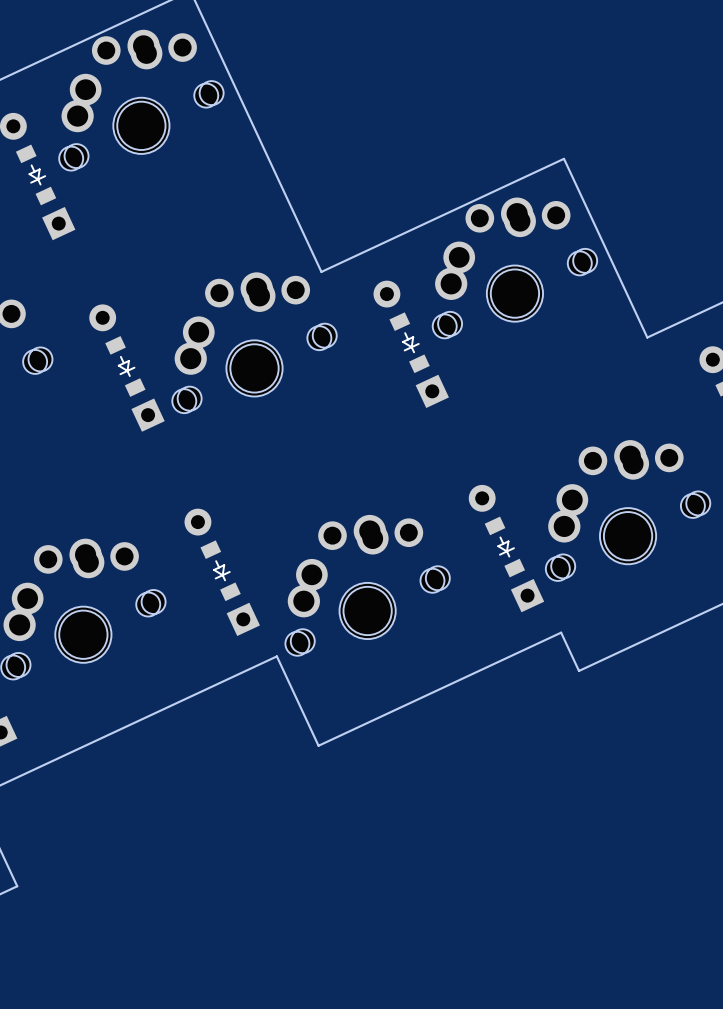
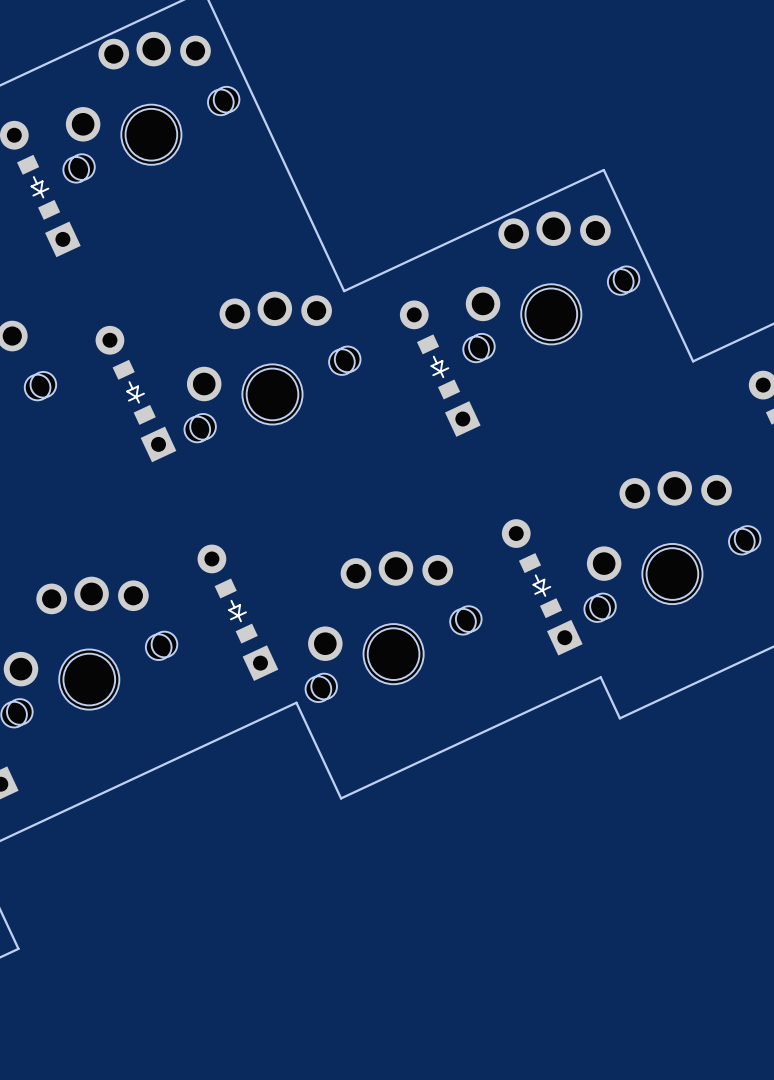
part: (116, 71) -> none
part: (489, 239) -> none
part: (229, 314) -> none
part: (602, 481) -> none
part: (342, 556) -> none
part: (58, 580) -> none

